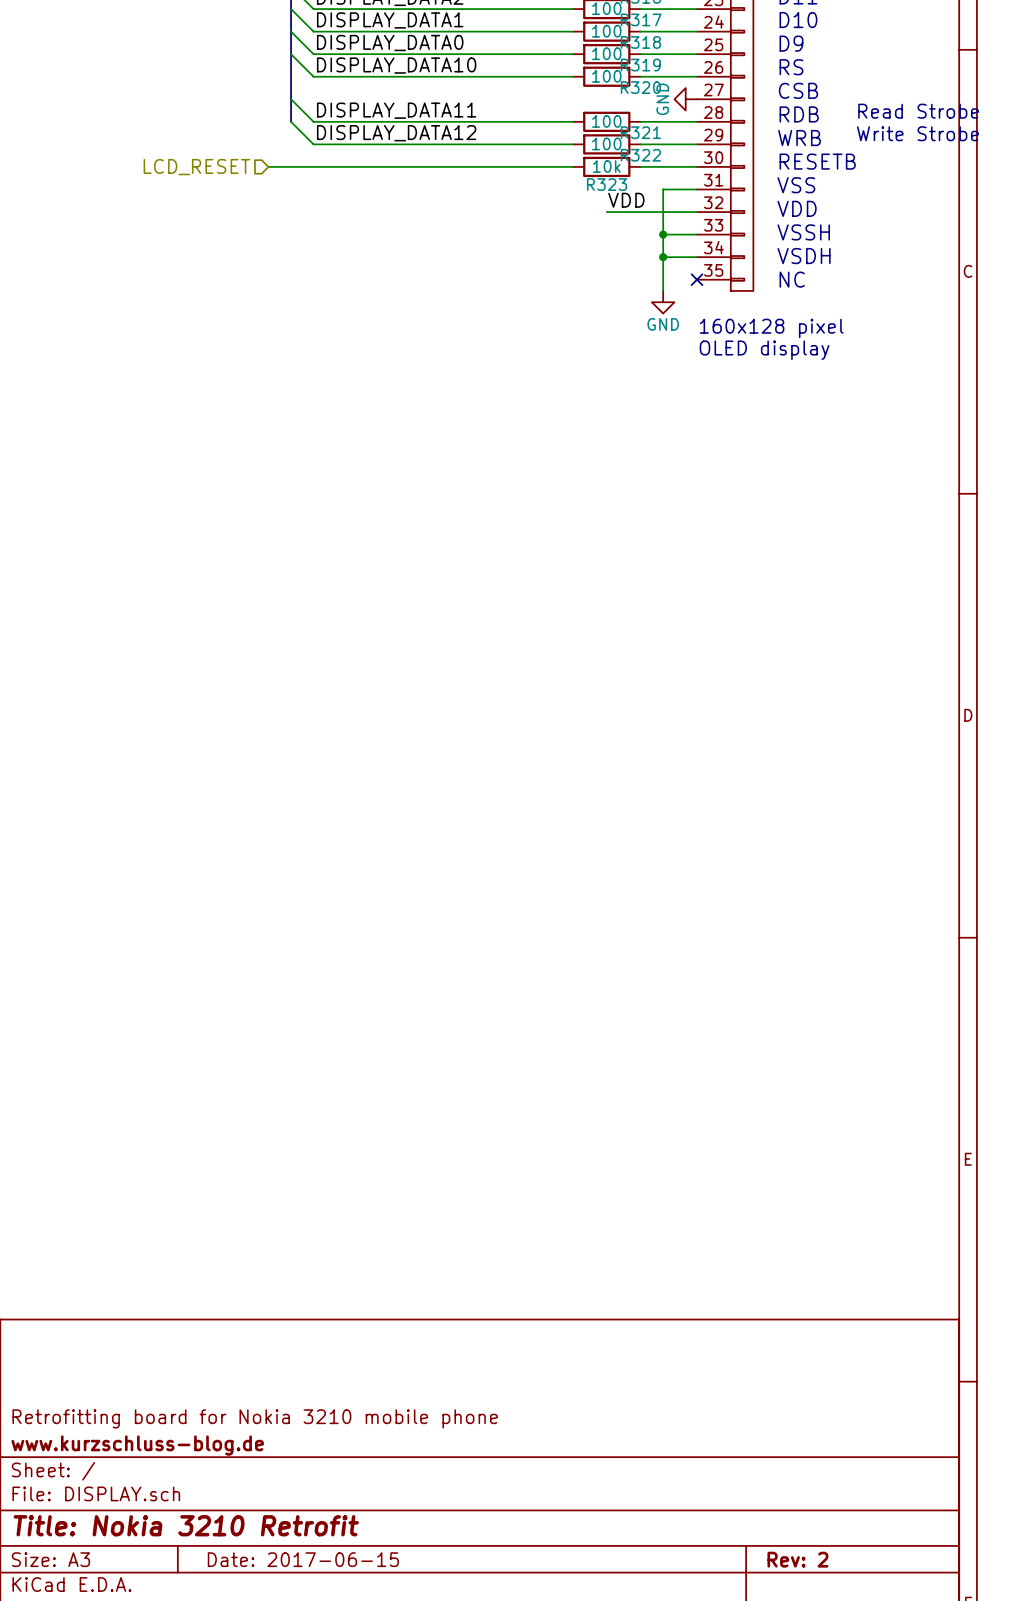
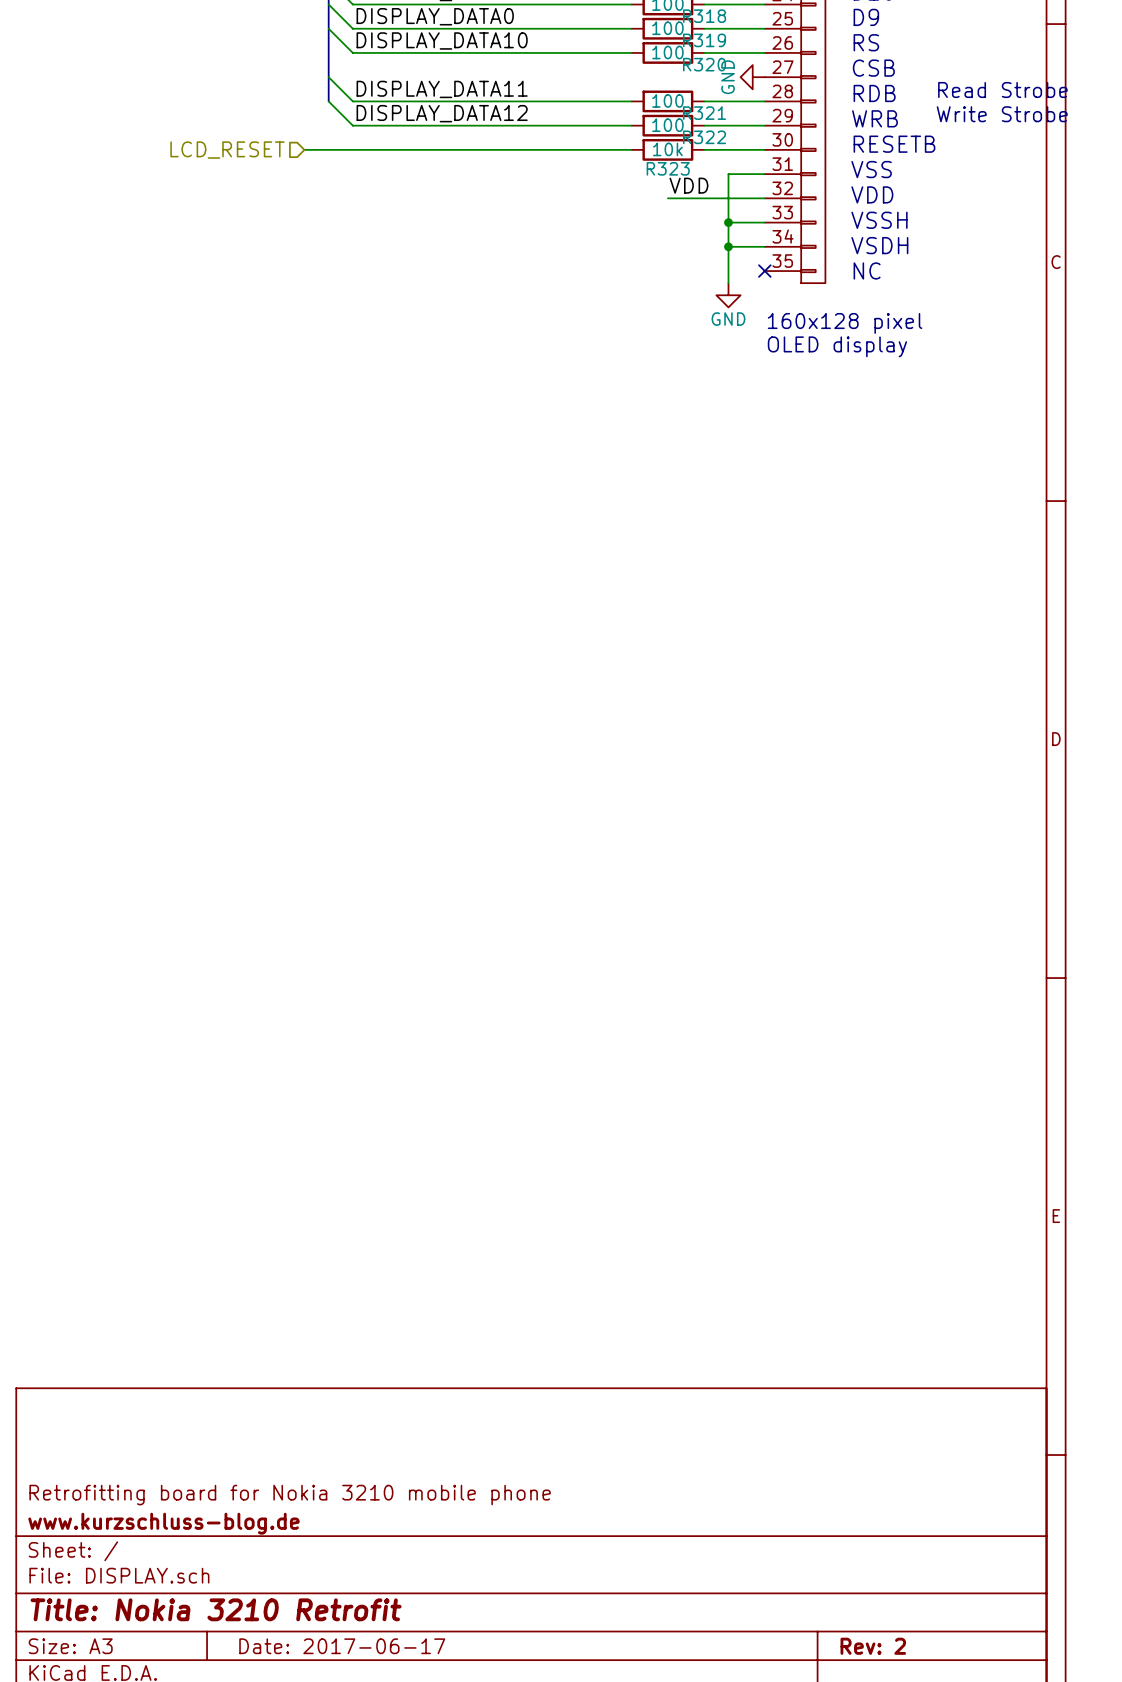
title block: Date: 2017-06-15 (303, 1559) -> Date: 2017-06-17 (342, 1646)

